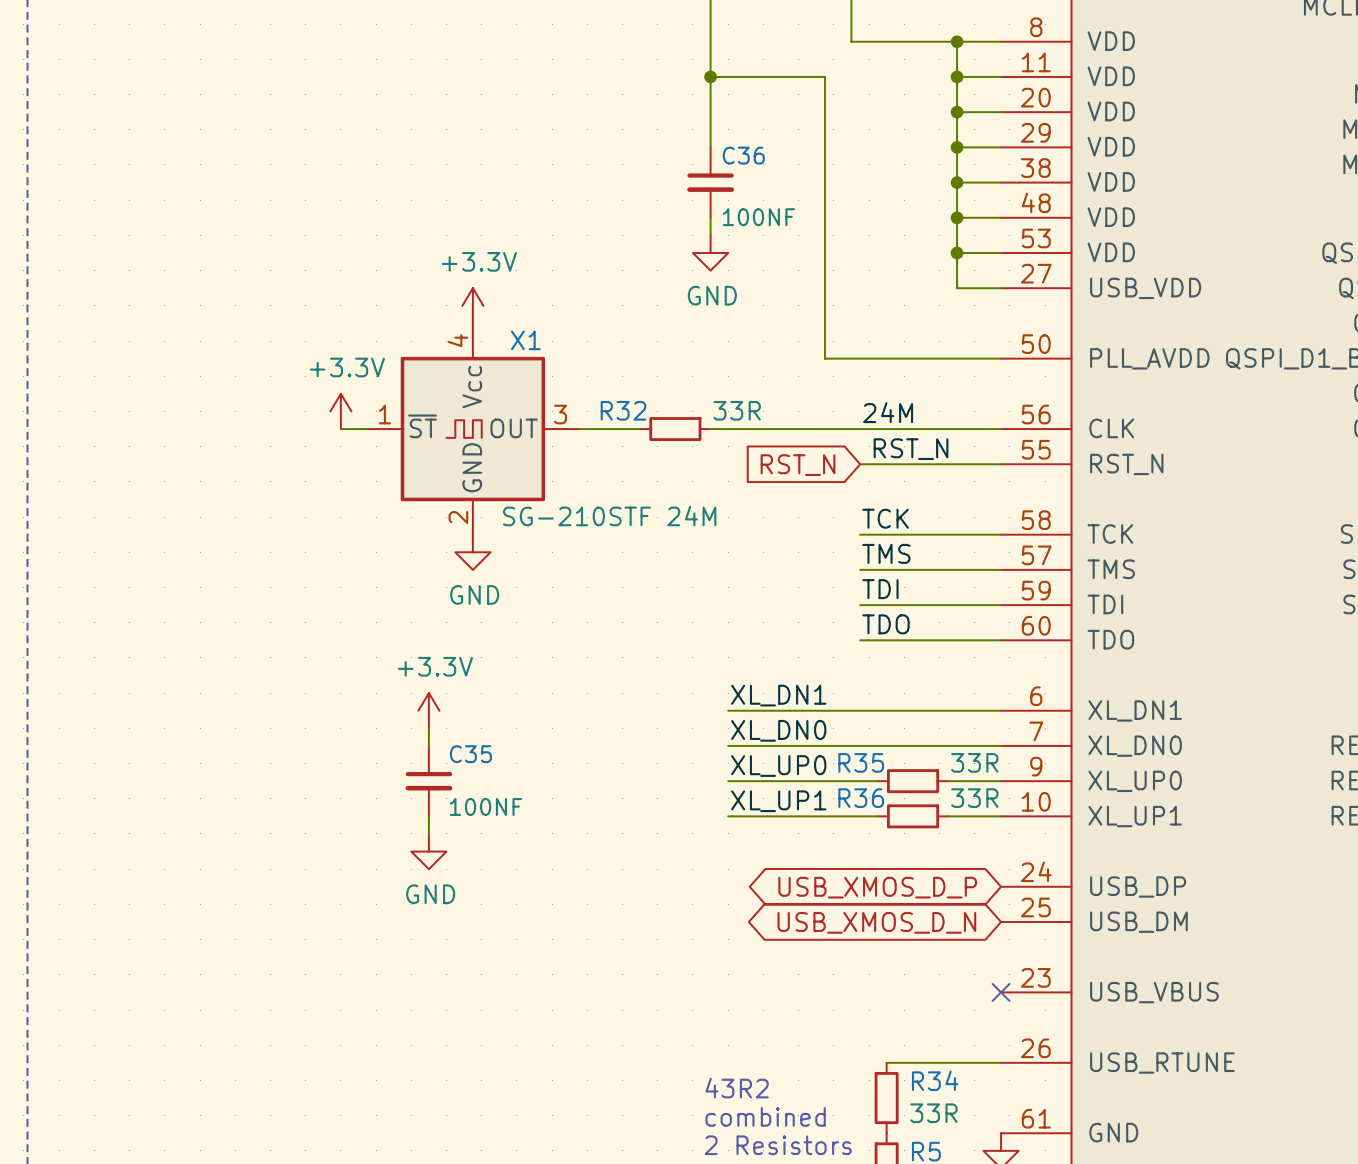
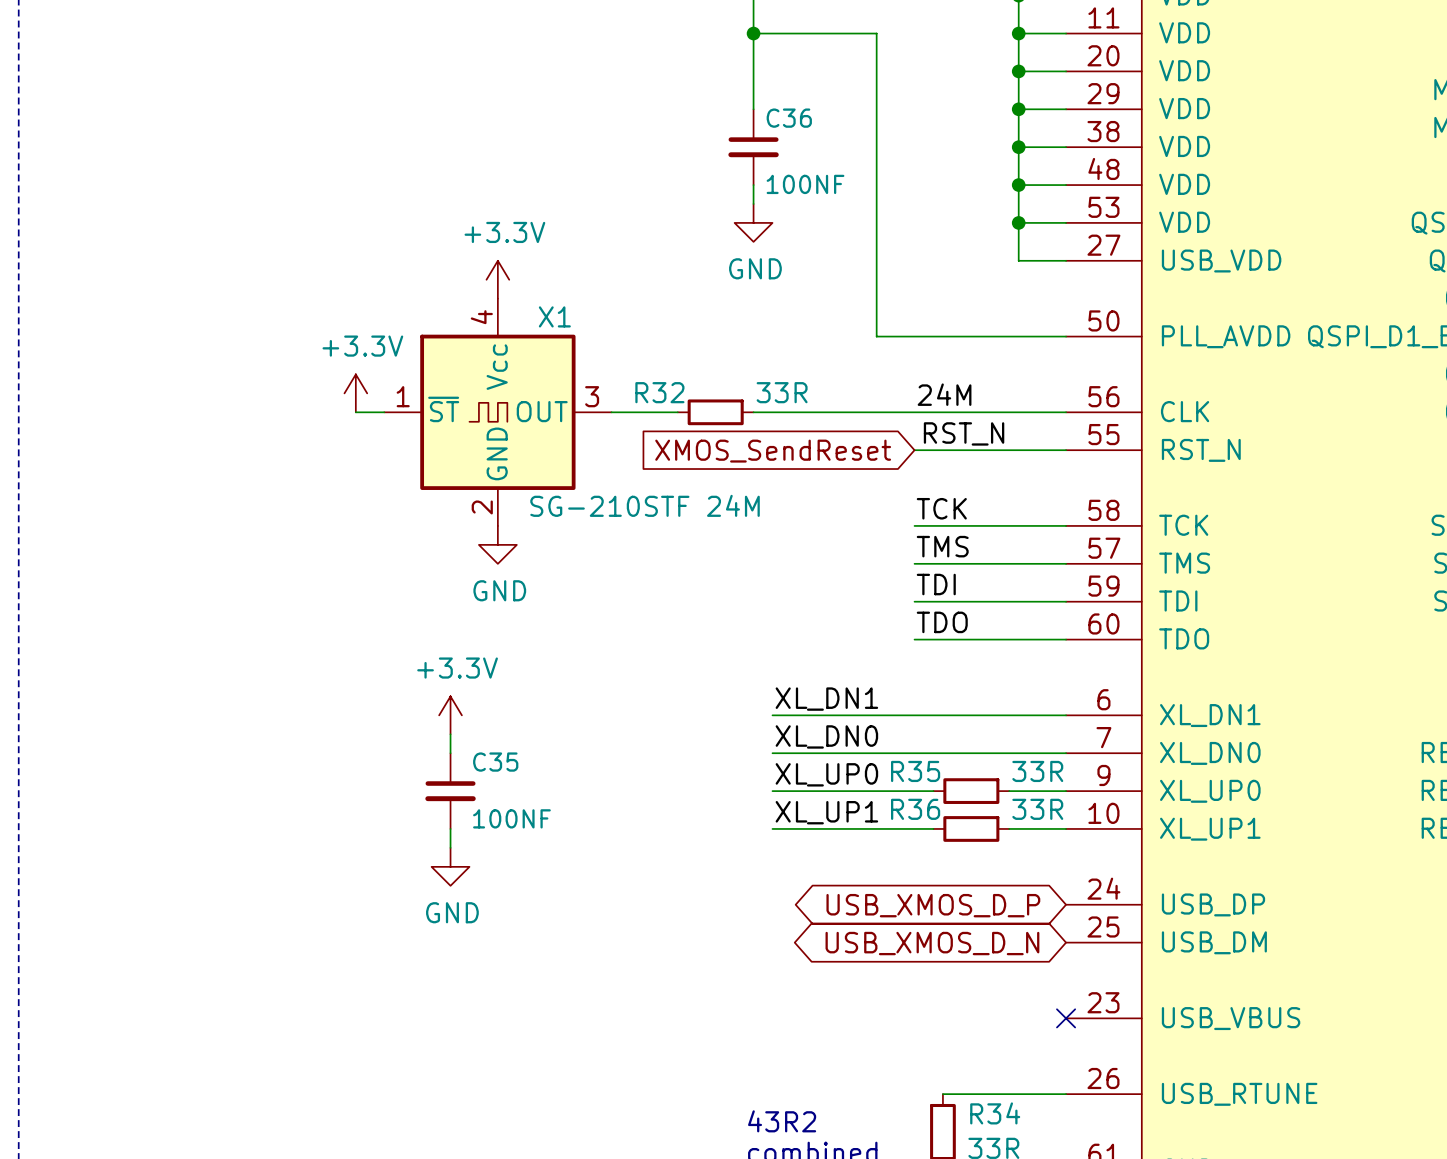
label position: RST_N (911, 449) -> RST_N (964, 433)
global label: RST_N (798, 465) -> XMOS_SendReset (773, 451)

